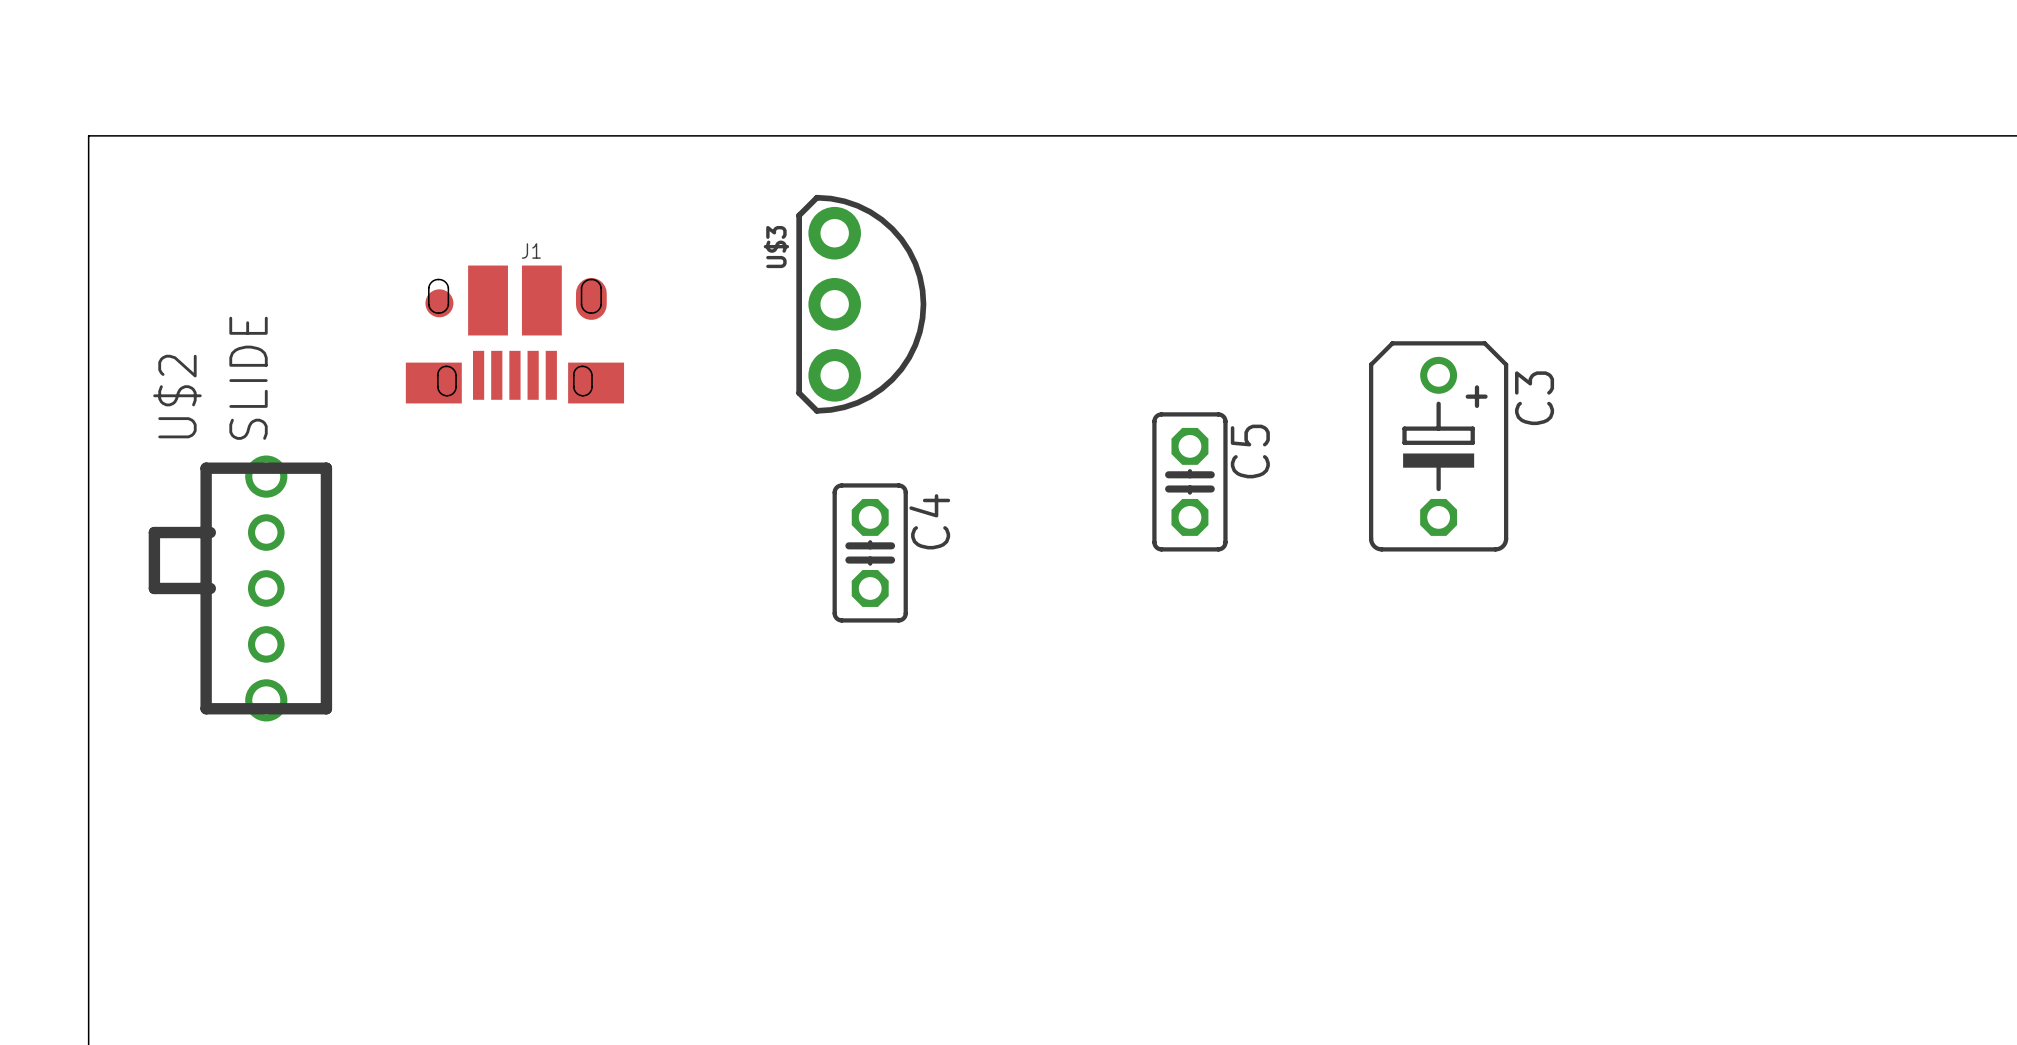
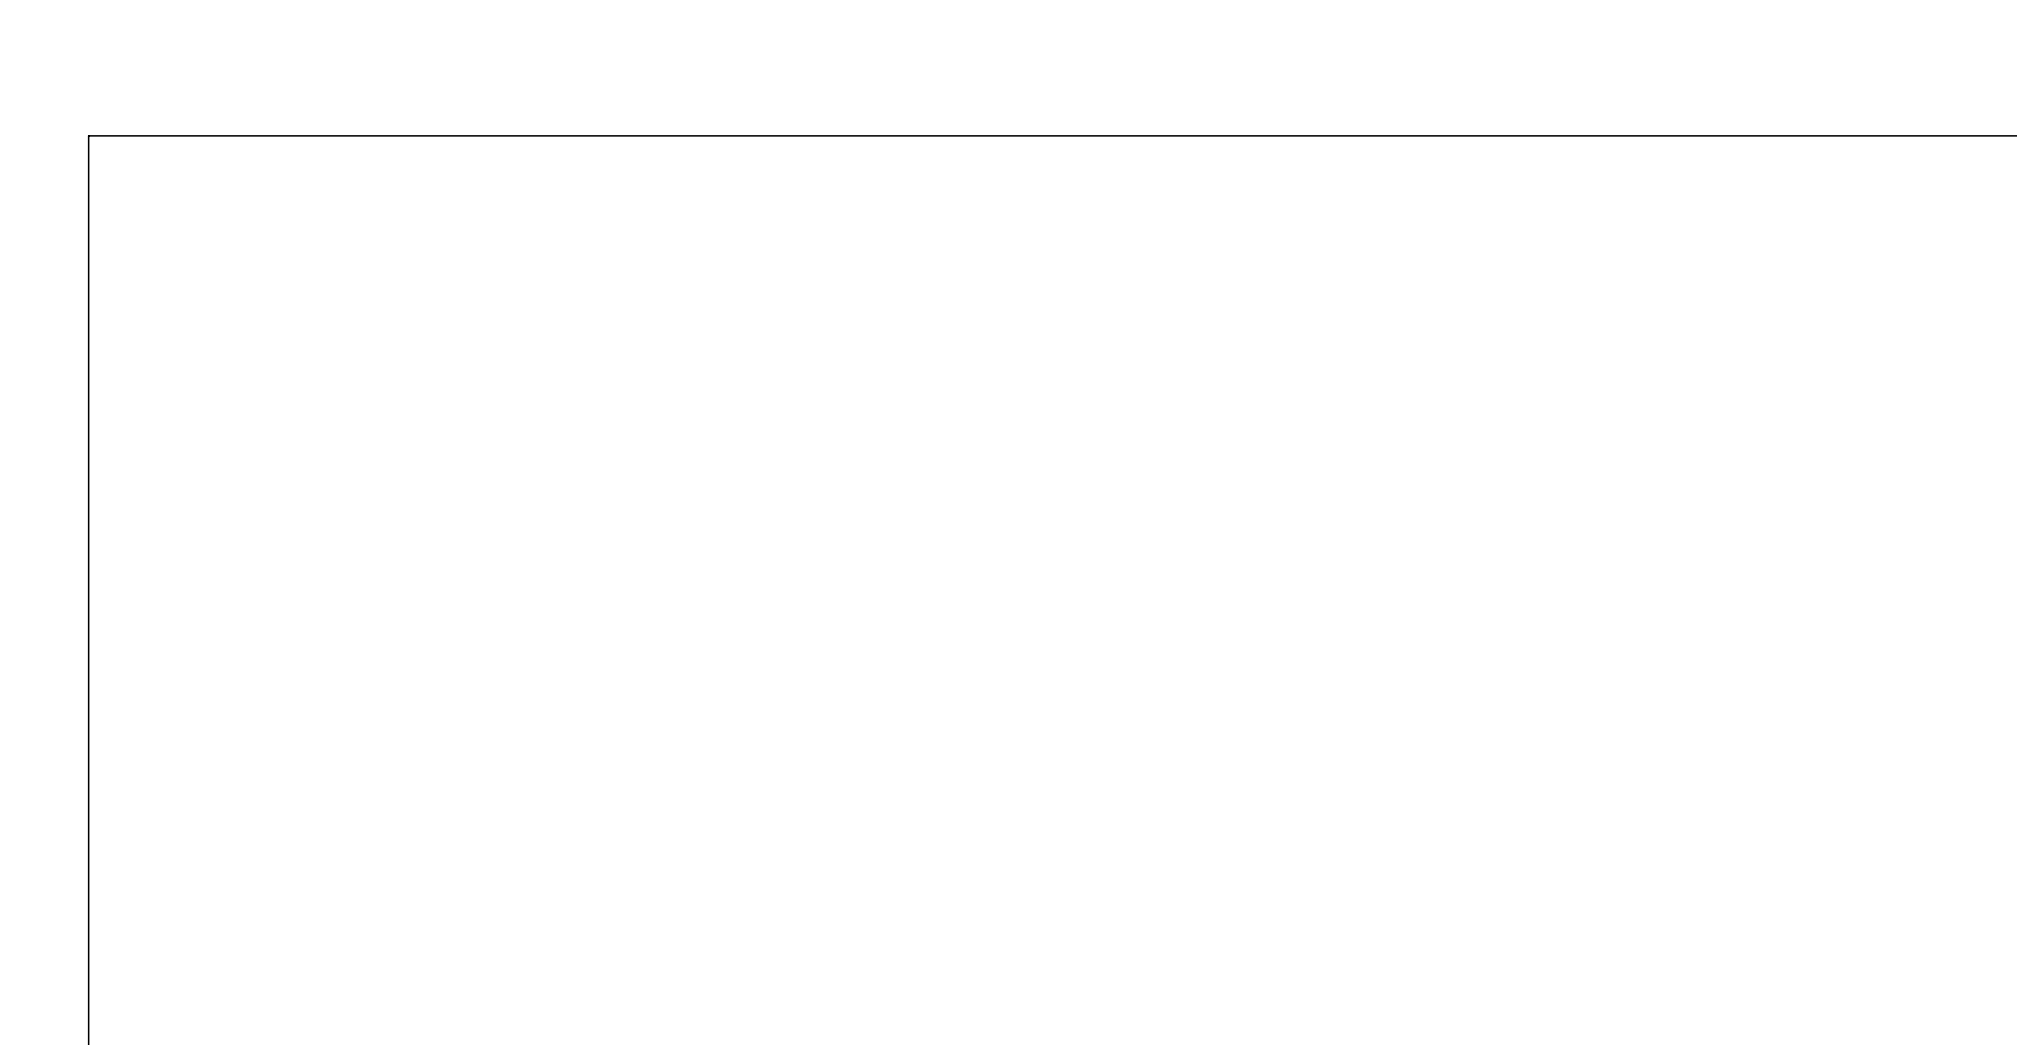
U$3: (861, 304) -> none
J1: (514, 334) -> none
C3: (1438, 446) -> none
C5: (1189, 481) -> none
C4: (870, 552) -> none
U$2: SLIDE (240, 588) -> none

